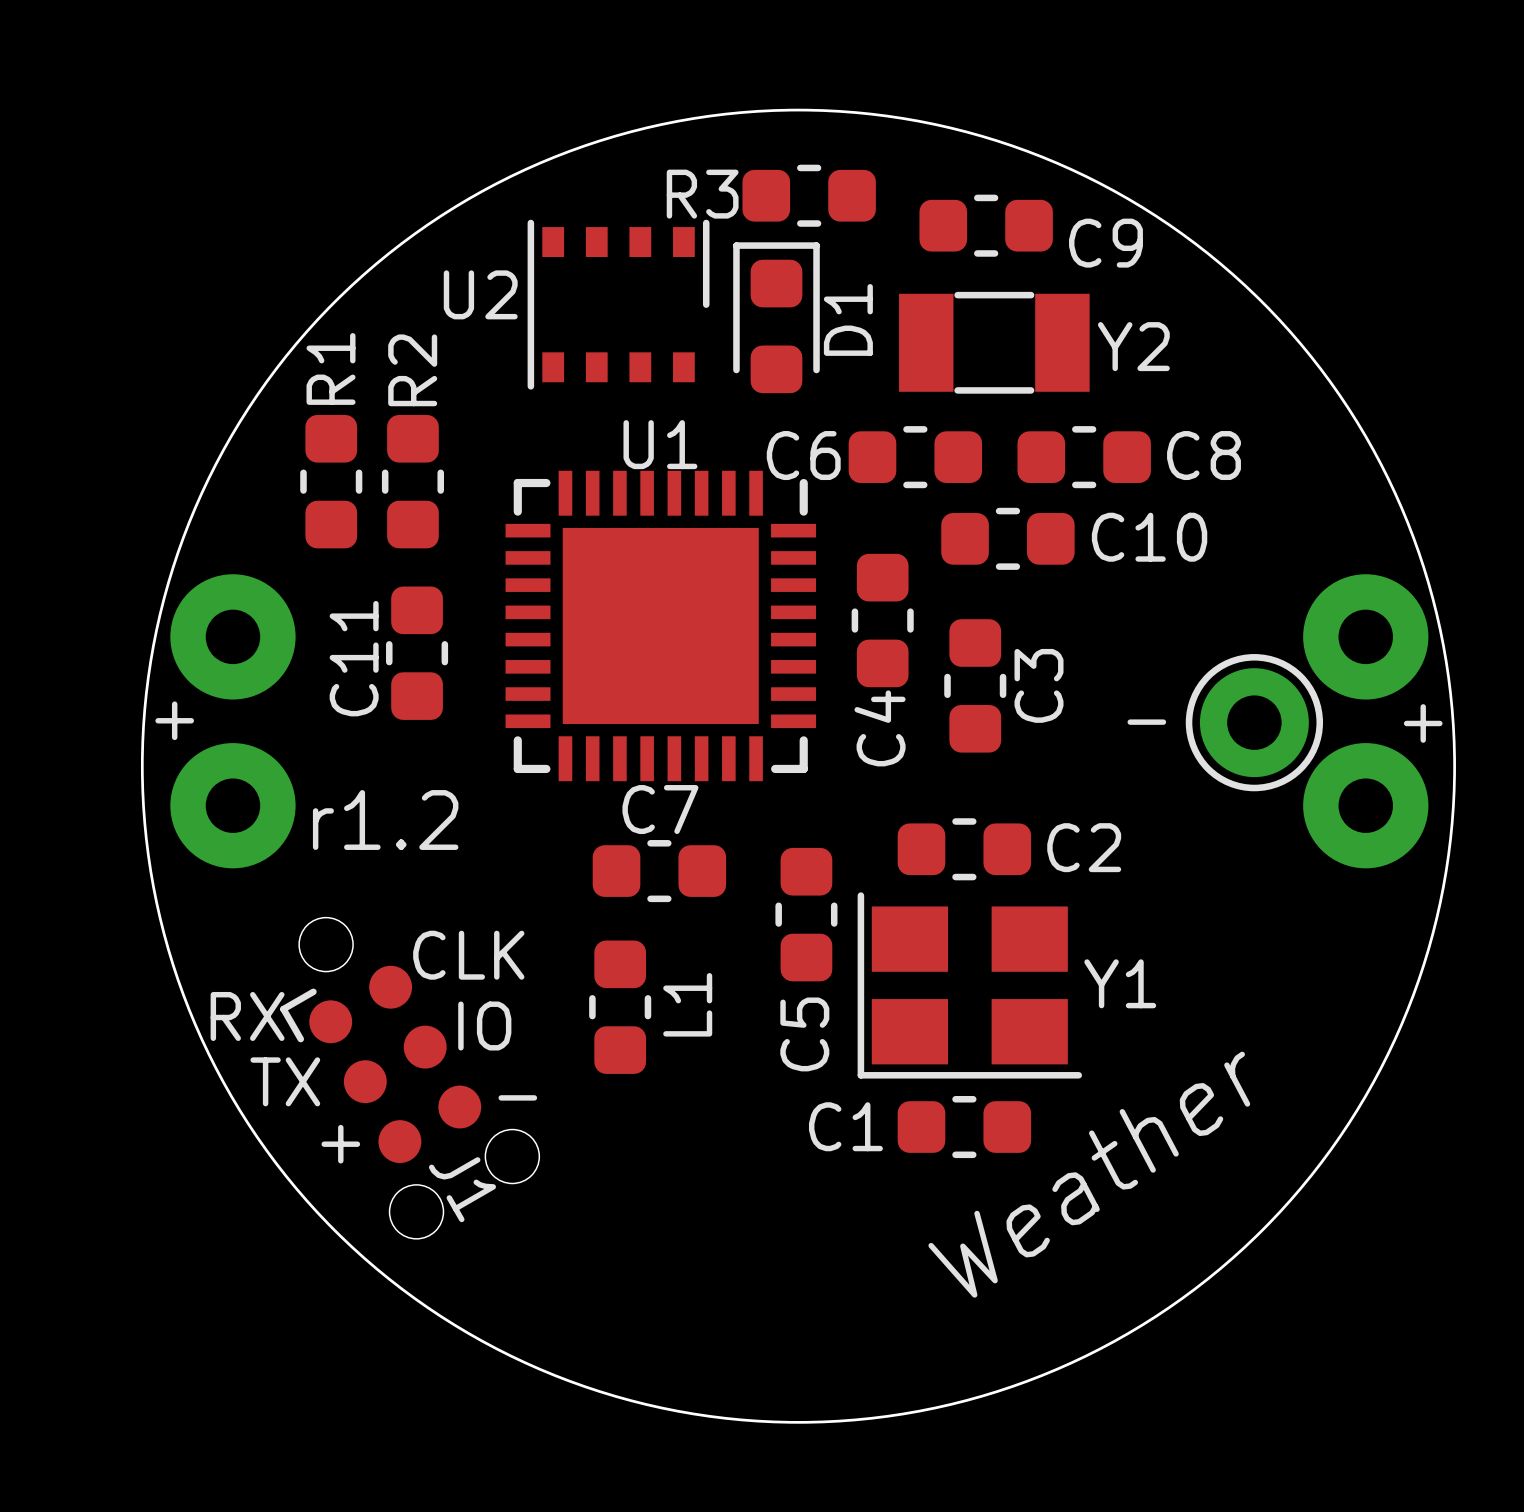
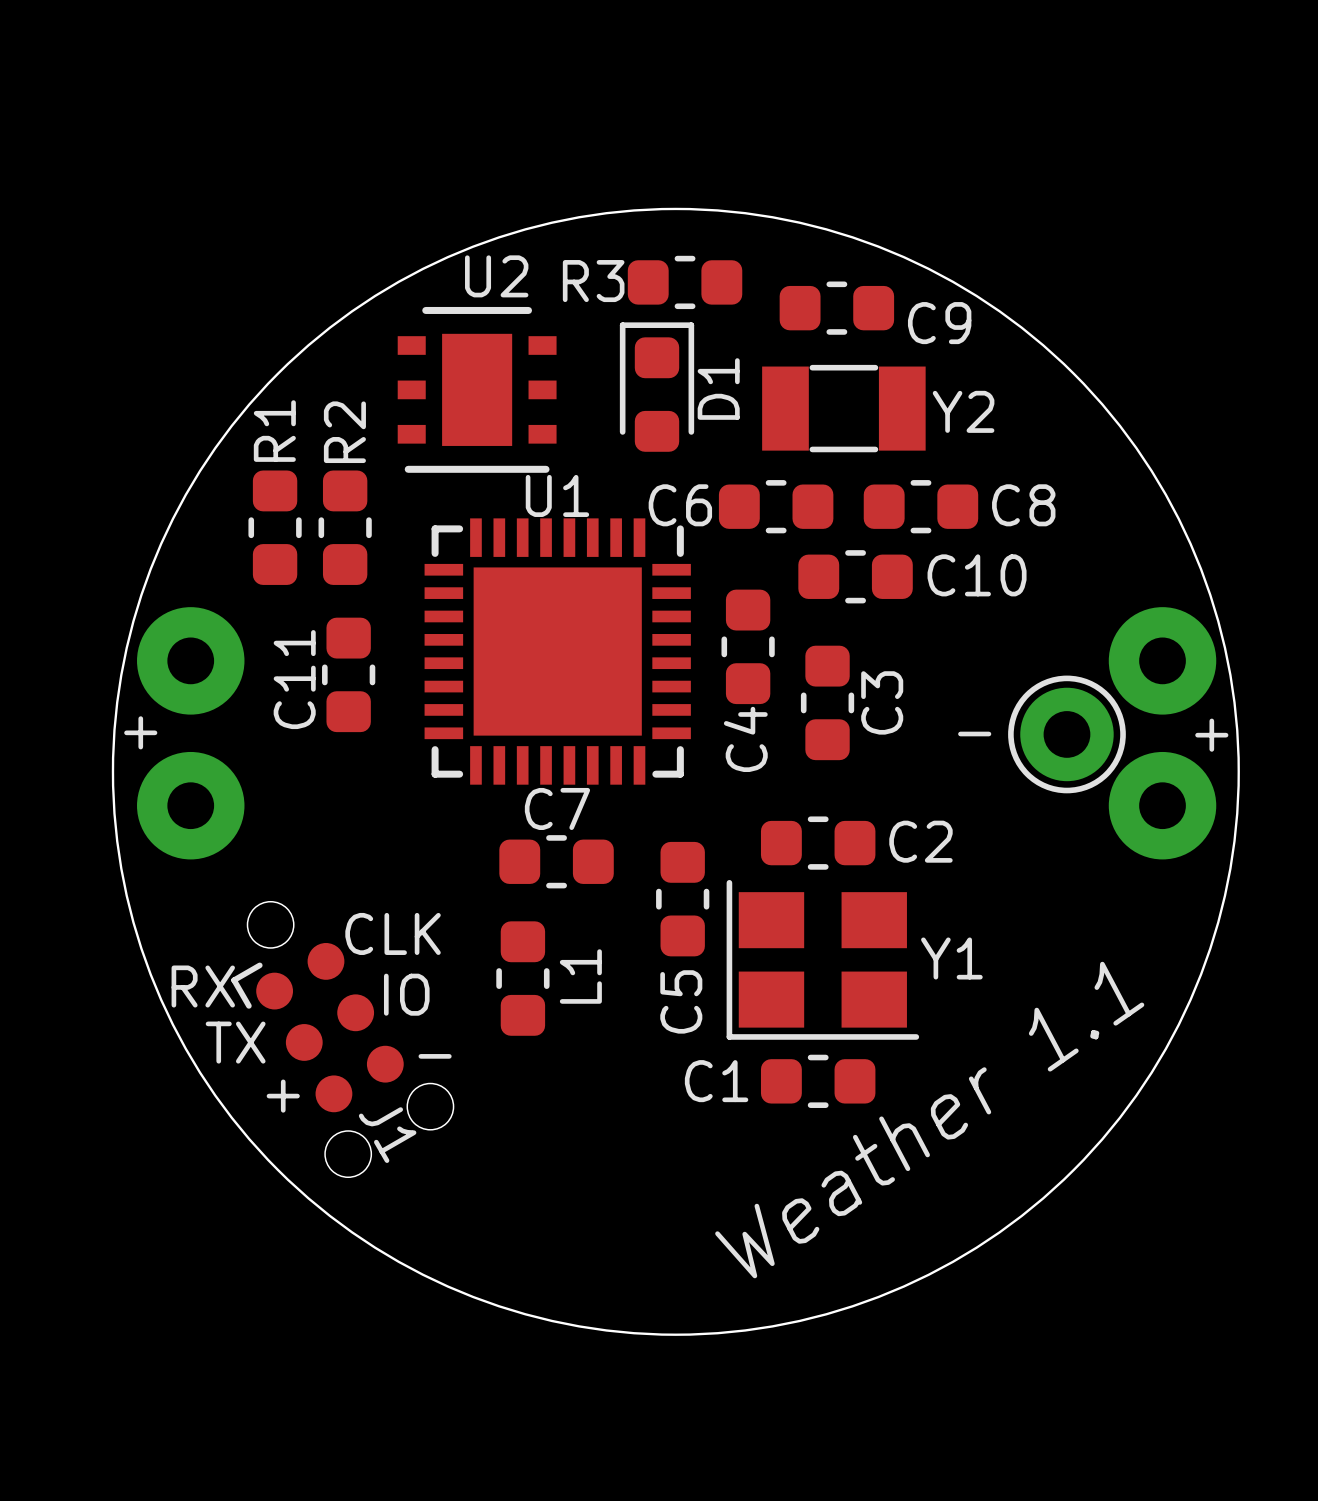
U2 footprint: [527, 219, 710, 390] -> [397, 306, 557, 473]
U2 name position: U2 (480, 294) -> U2 (496, 276)
text: r1.2 (385, 820) -> none
text: Weather (1089, 1174) -> Weather 1.1 (929, 1120)

